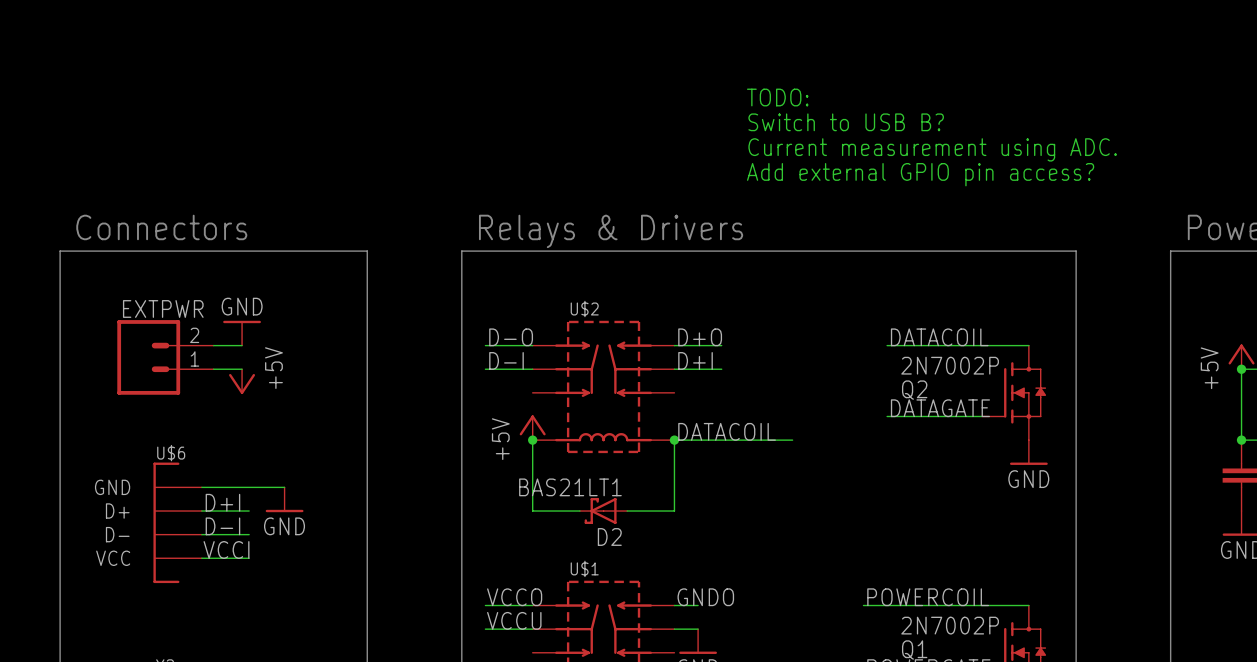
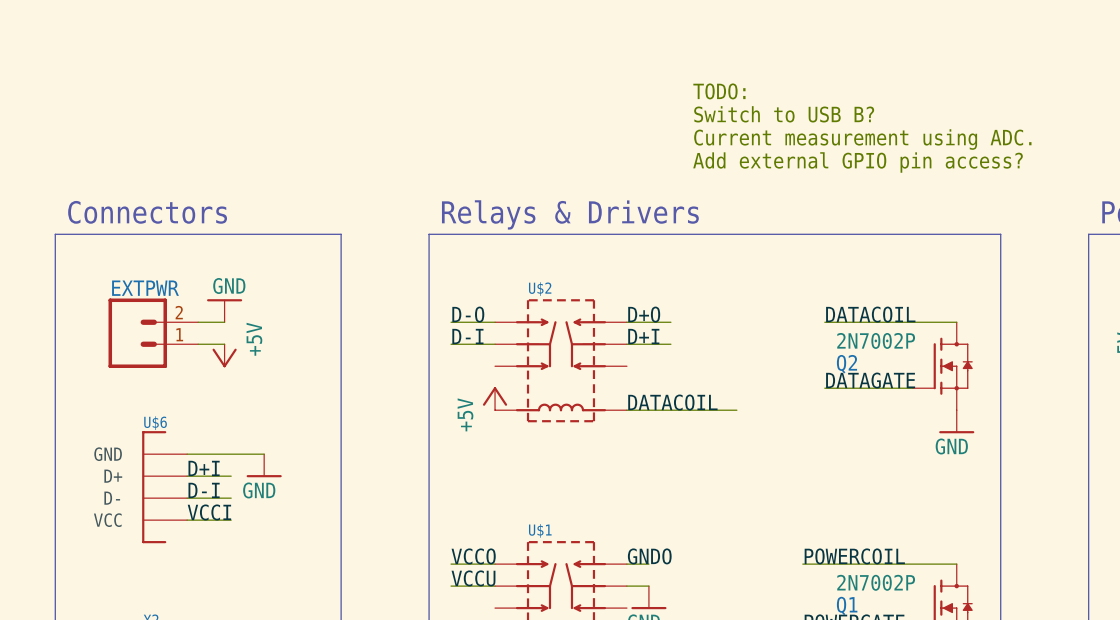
wire: (532, 440) (532, 511) (579, 511) -> none
junction: (532, 440) -> none
wire: (674, 440) (674, 511) (627, 511) -> none
junction: (674, 440) -> none
D2: BAS21LT1 (603, 511) -> none

